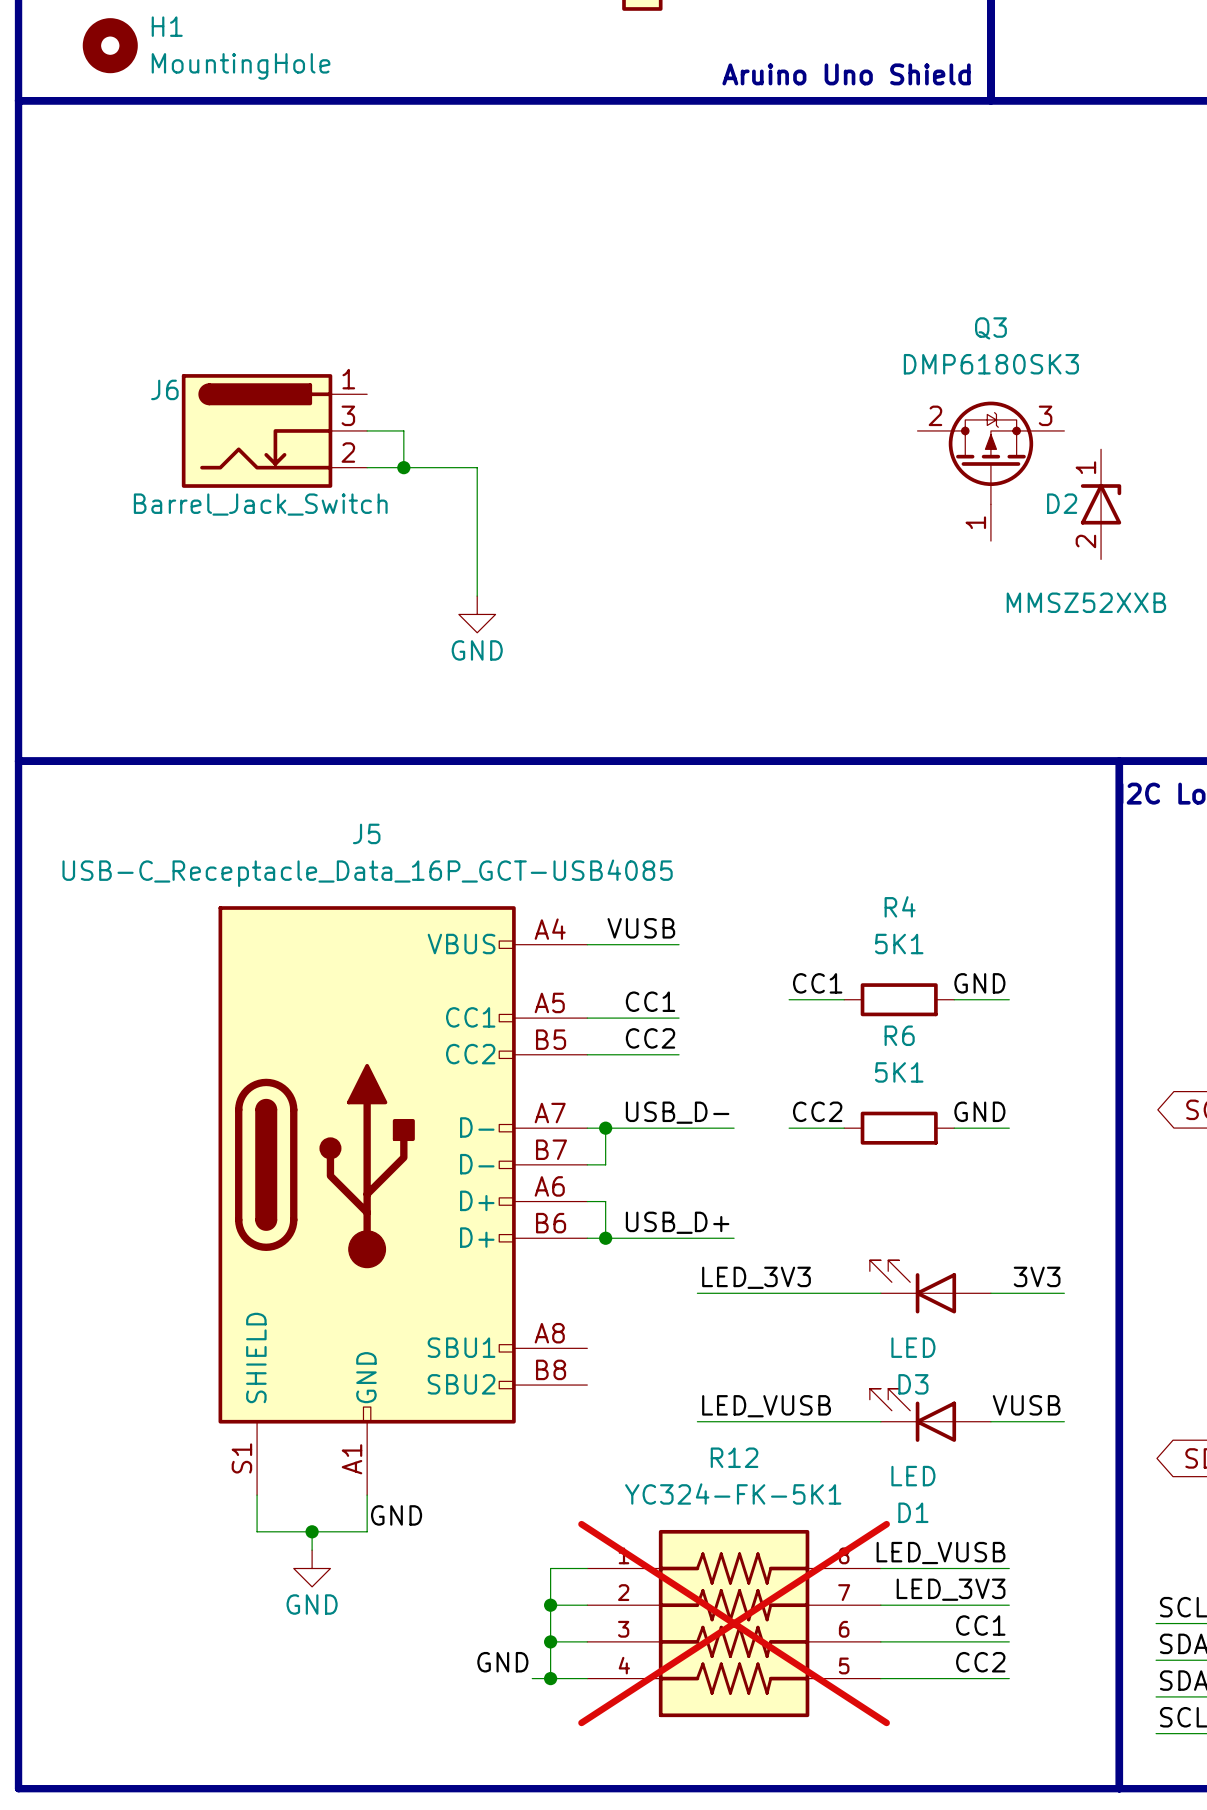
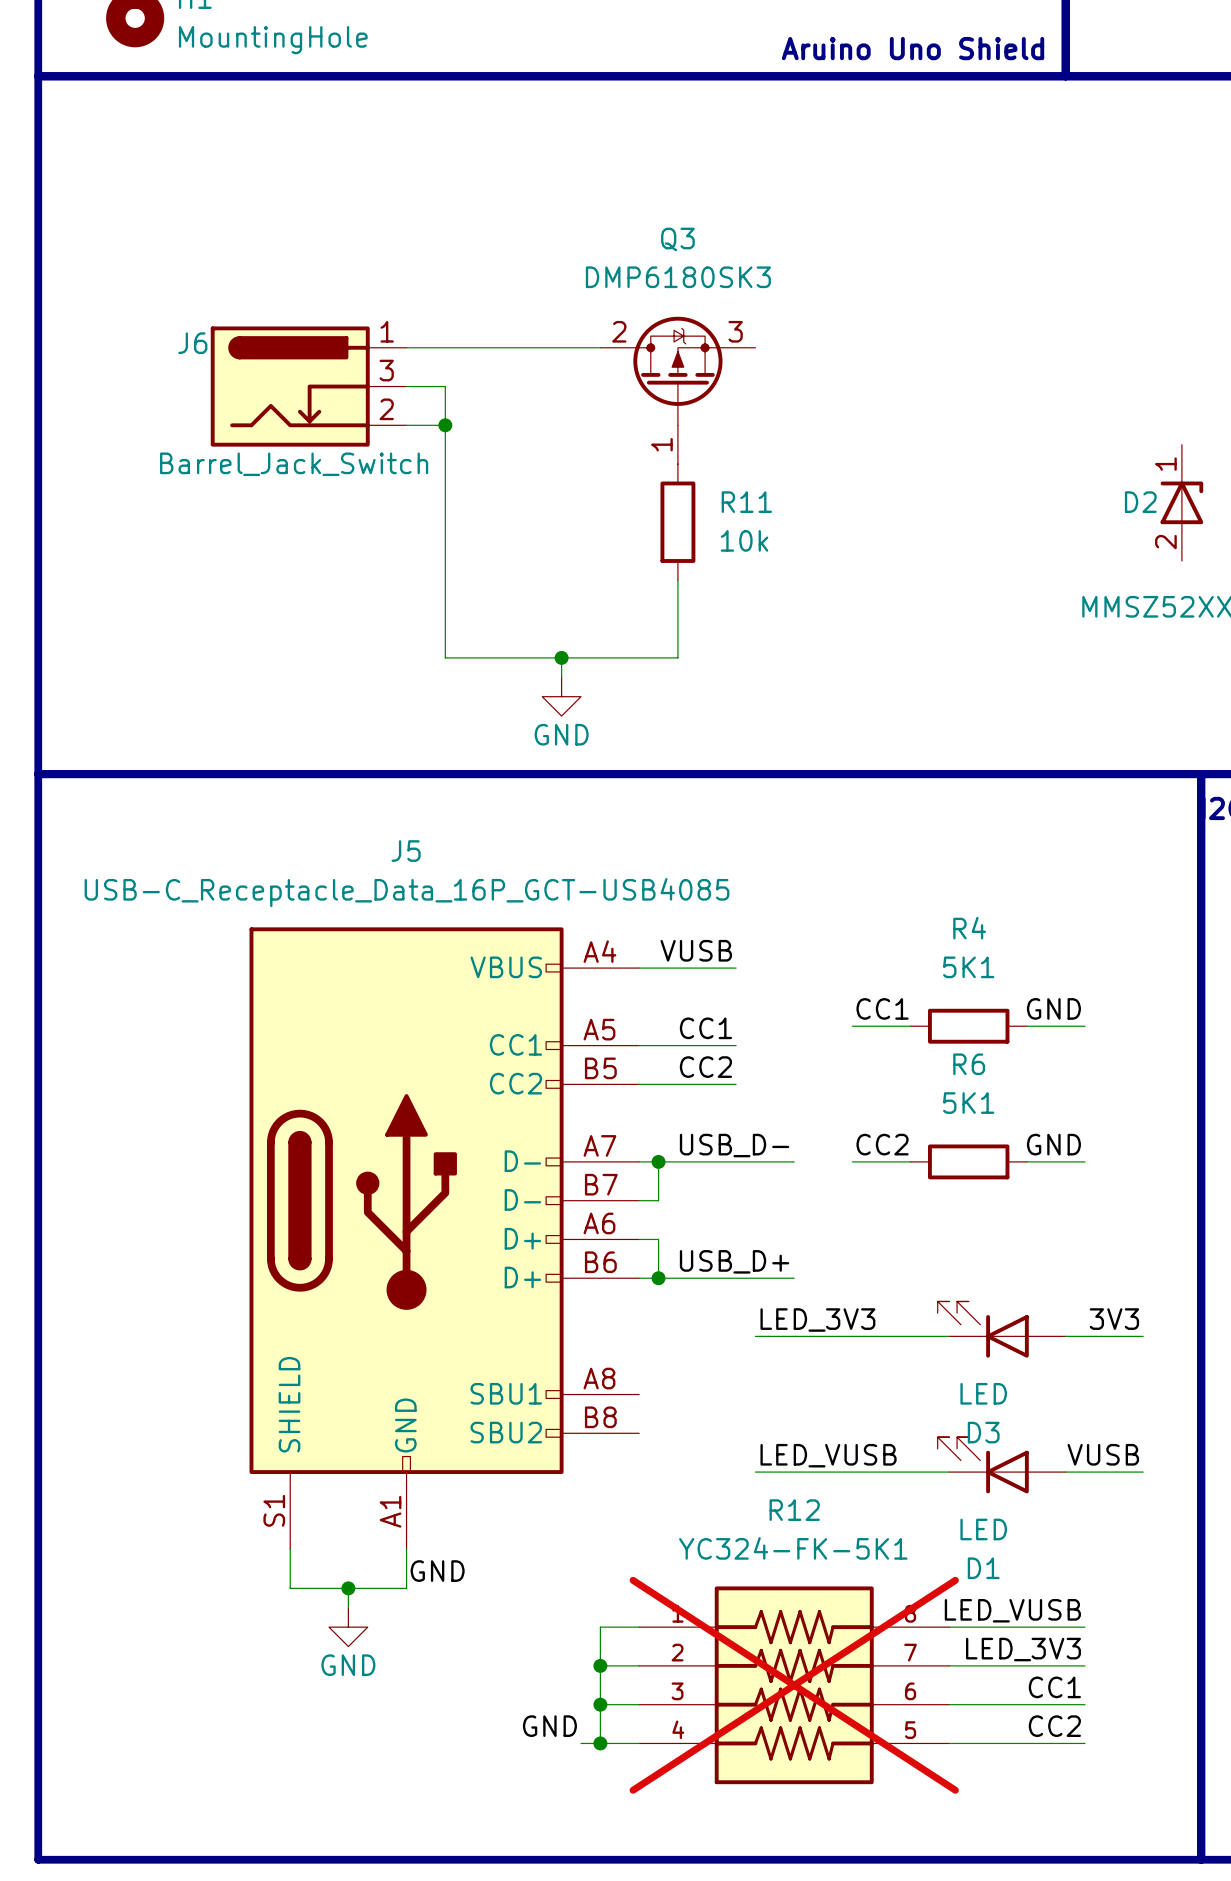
wire: none -> (406, 347) (600, 347)
wire: none -> (406, 386) (445, 386) (445, 425)
J6 position: (274, 430) -> (308, 386)
wire: (367, 467) (477, 467) (477, 596) -> none
wire: none -> (445, 464) (445, 657) (677, 657) (677, 580)
junction position: (403, 467) -> (445, 425)
Q3 position: (990, 471) -> (677, 390)
R11: none -> 10k (677, 522)
power symbol position: GND (477, 614) -> GND (561, 696)
wire: none -> (561, 657) (561, 677)
junction: none -> (561, 657)

